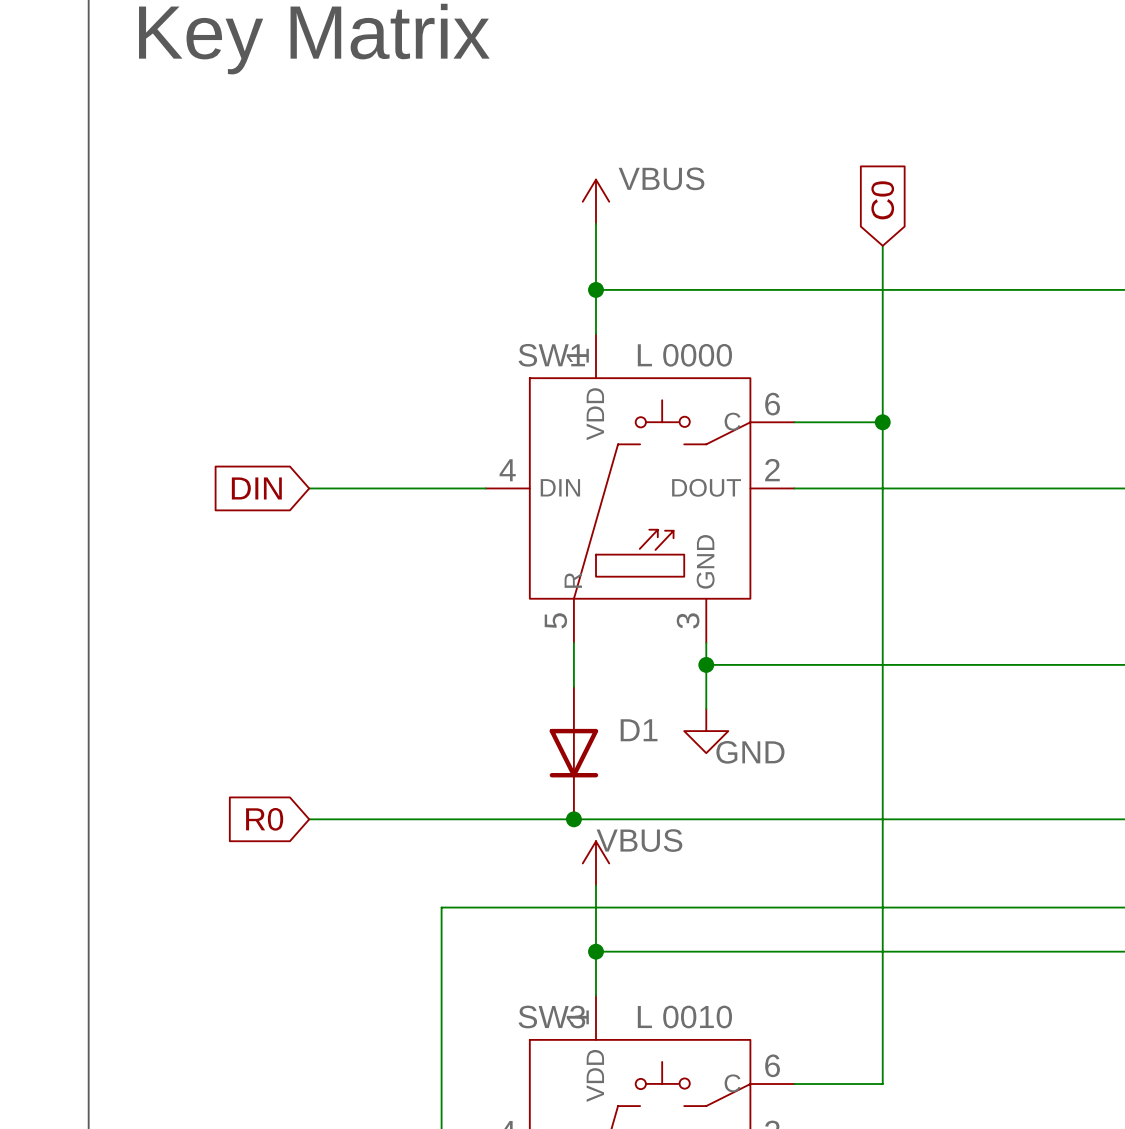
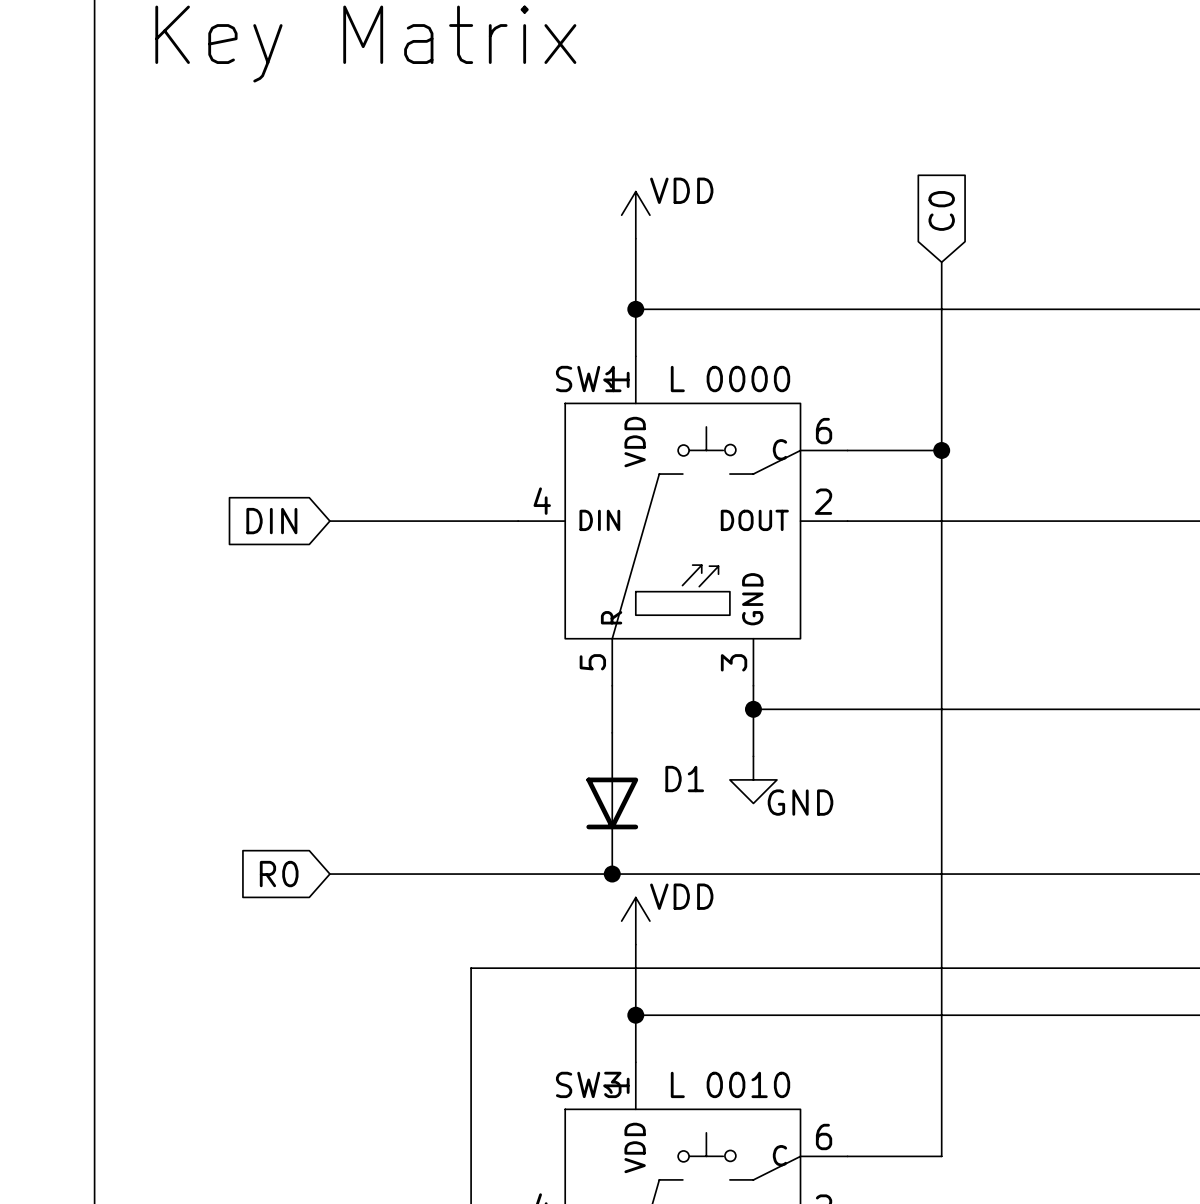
power symbol: VBUS (596, 201) -> VDD (635, 215)
power symbol: VBUS (596, 863) -> VDD (635, 921)

